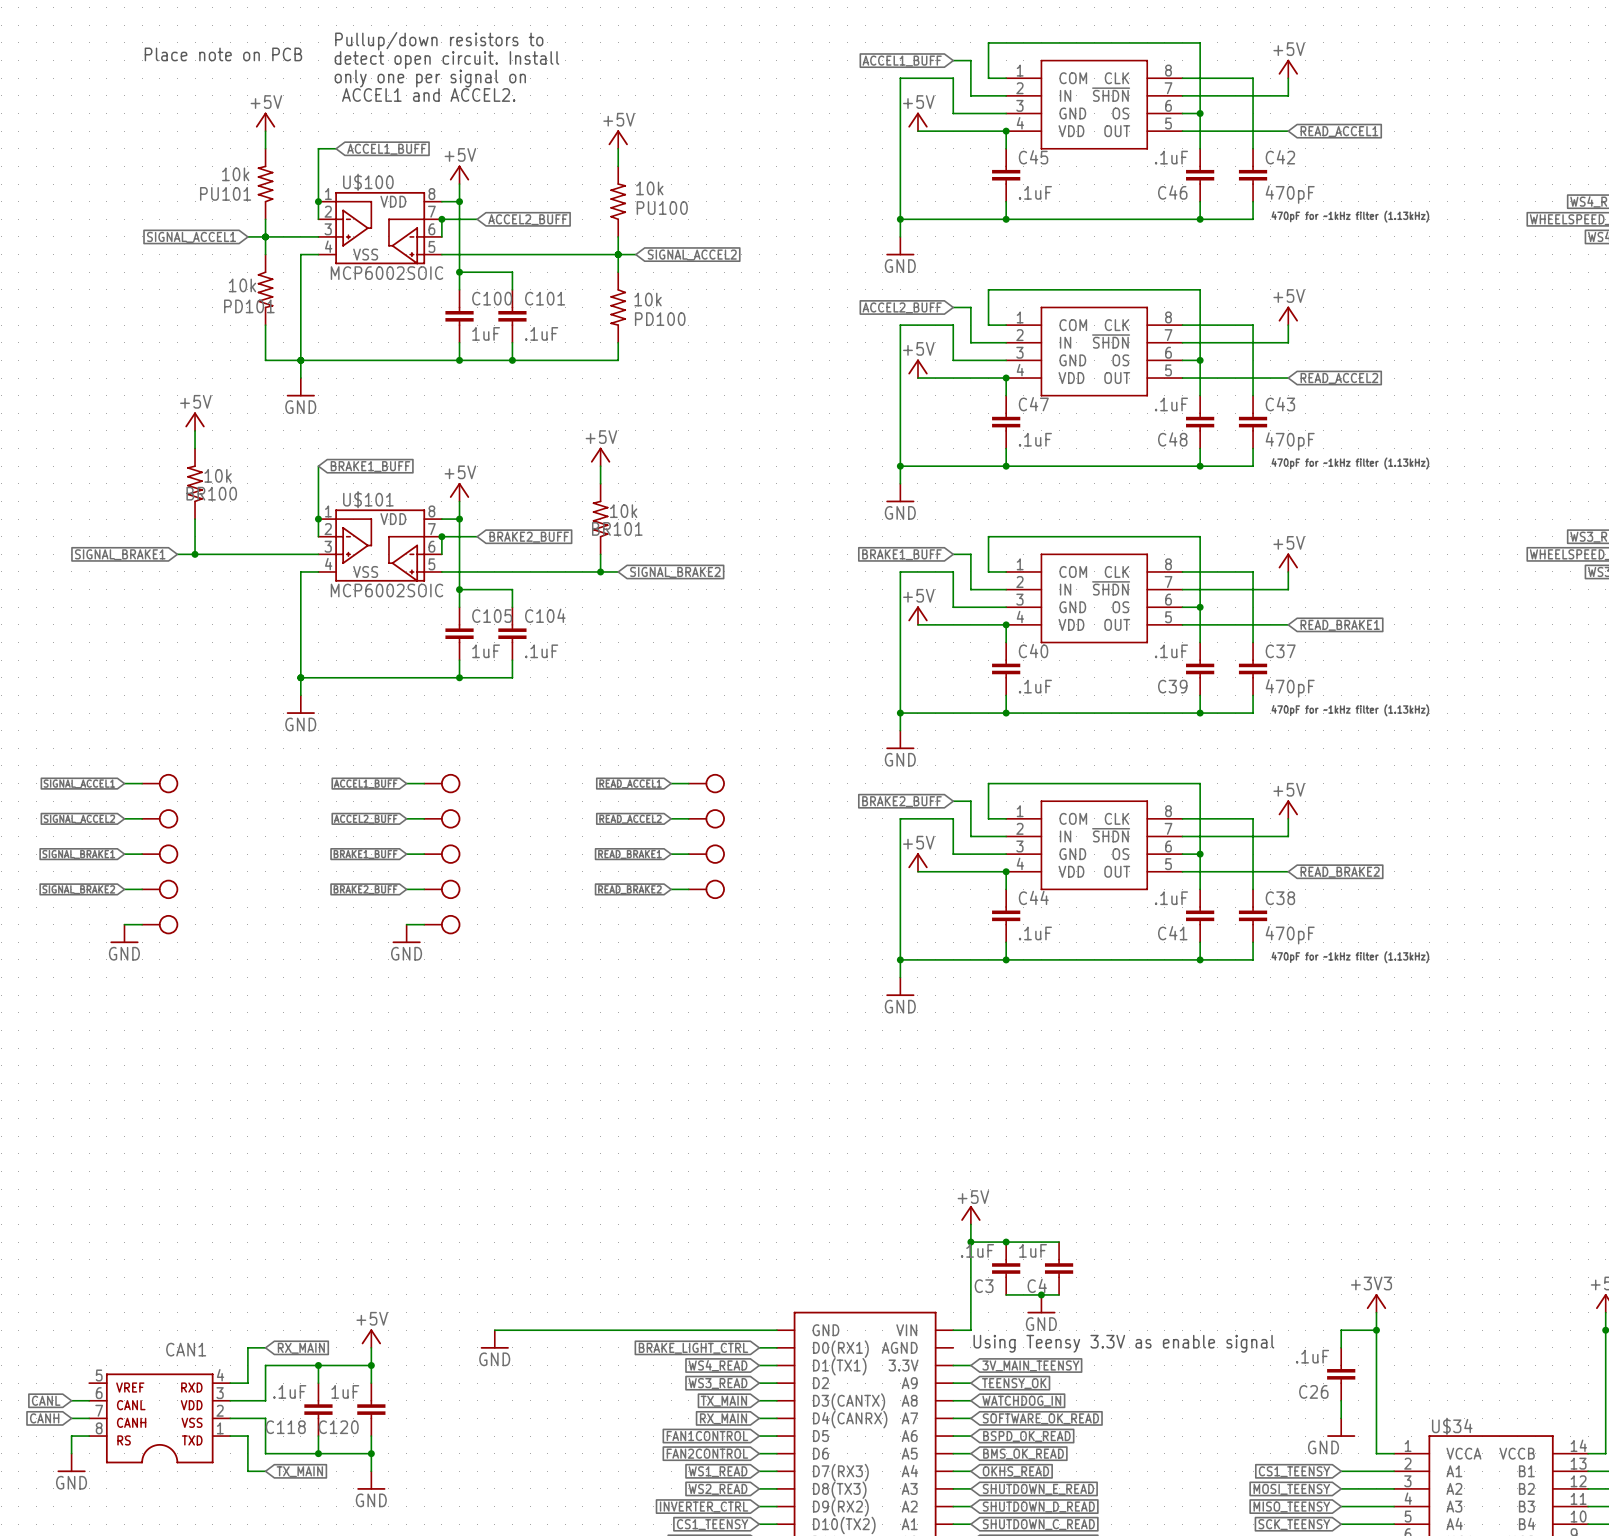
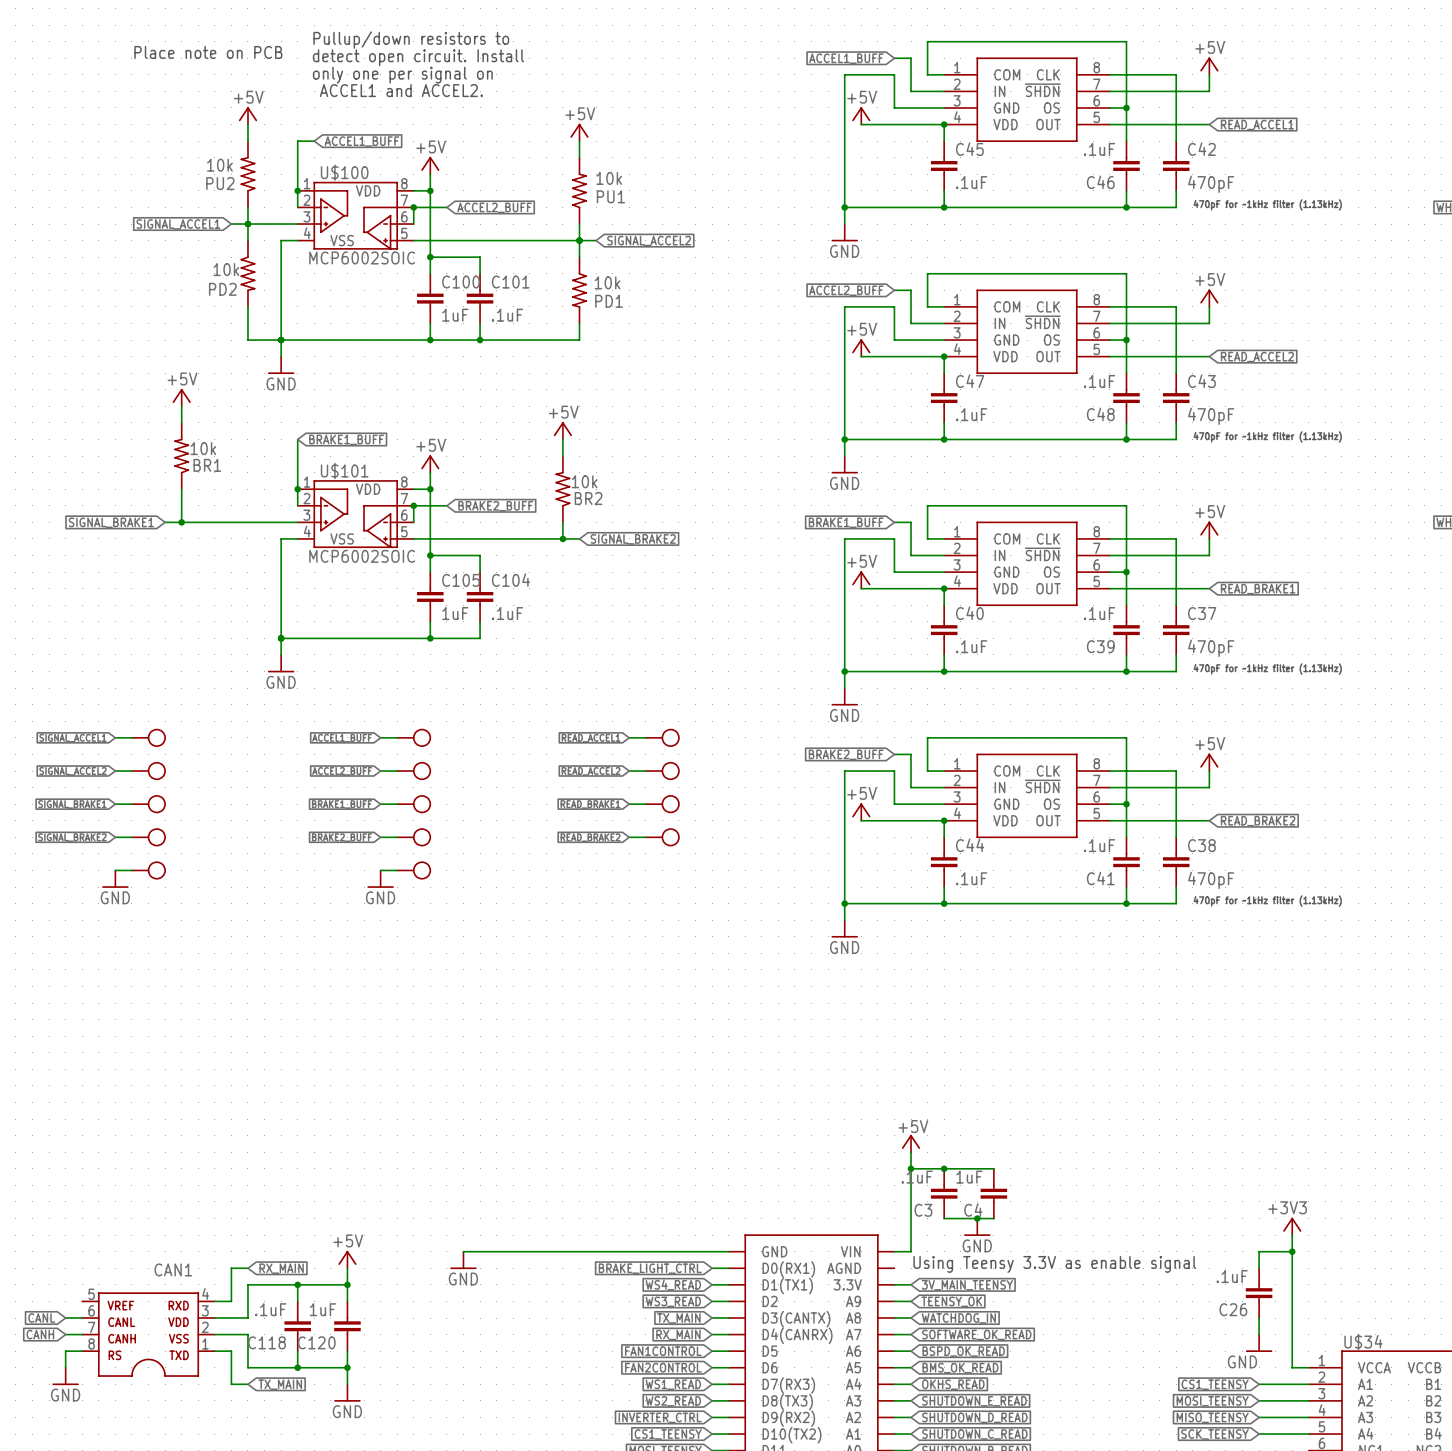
PU101 name: PU101 (225, 193) -> PU2 (220, 183)
PU100 name: PU100 (662, 208) -> PU1 (610, 196)
PD101 name: PD101 (249, 306) -> PD2 (222, 289)
PD100 name: PD100 (660, 319) -> PD1 (609, 301)
BR100 name: BR100 (211, 493) -> BR1 (207, 465)
BR101 name: BR101 (617, 528) -> BR2 (588, 498)

